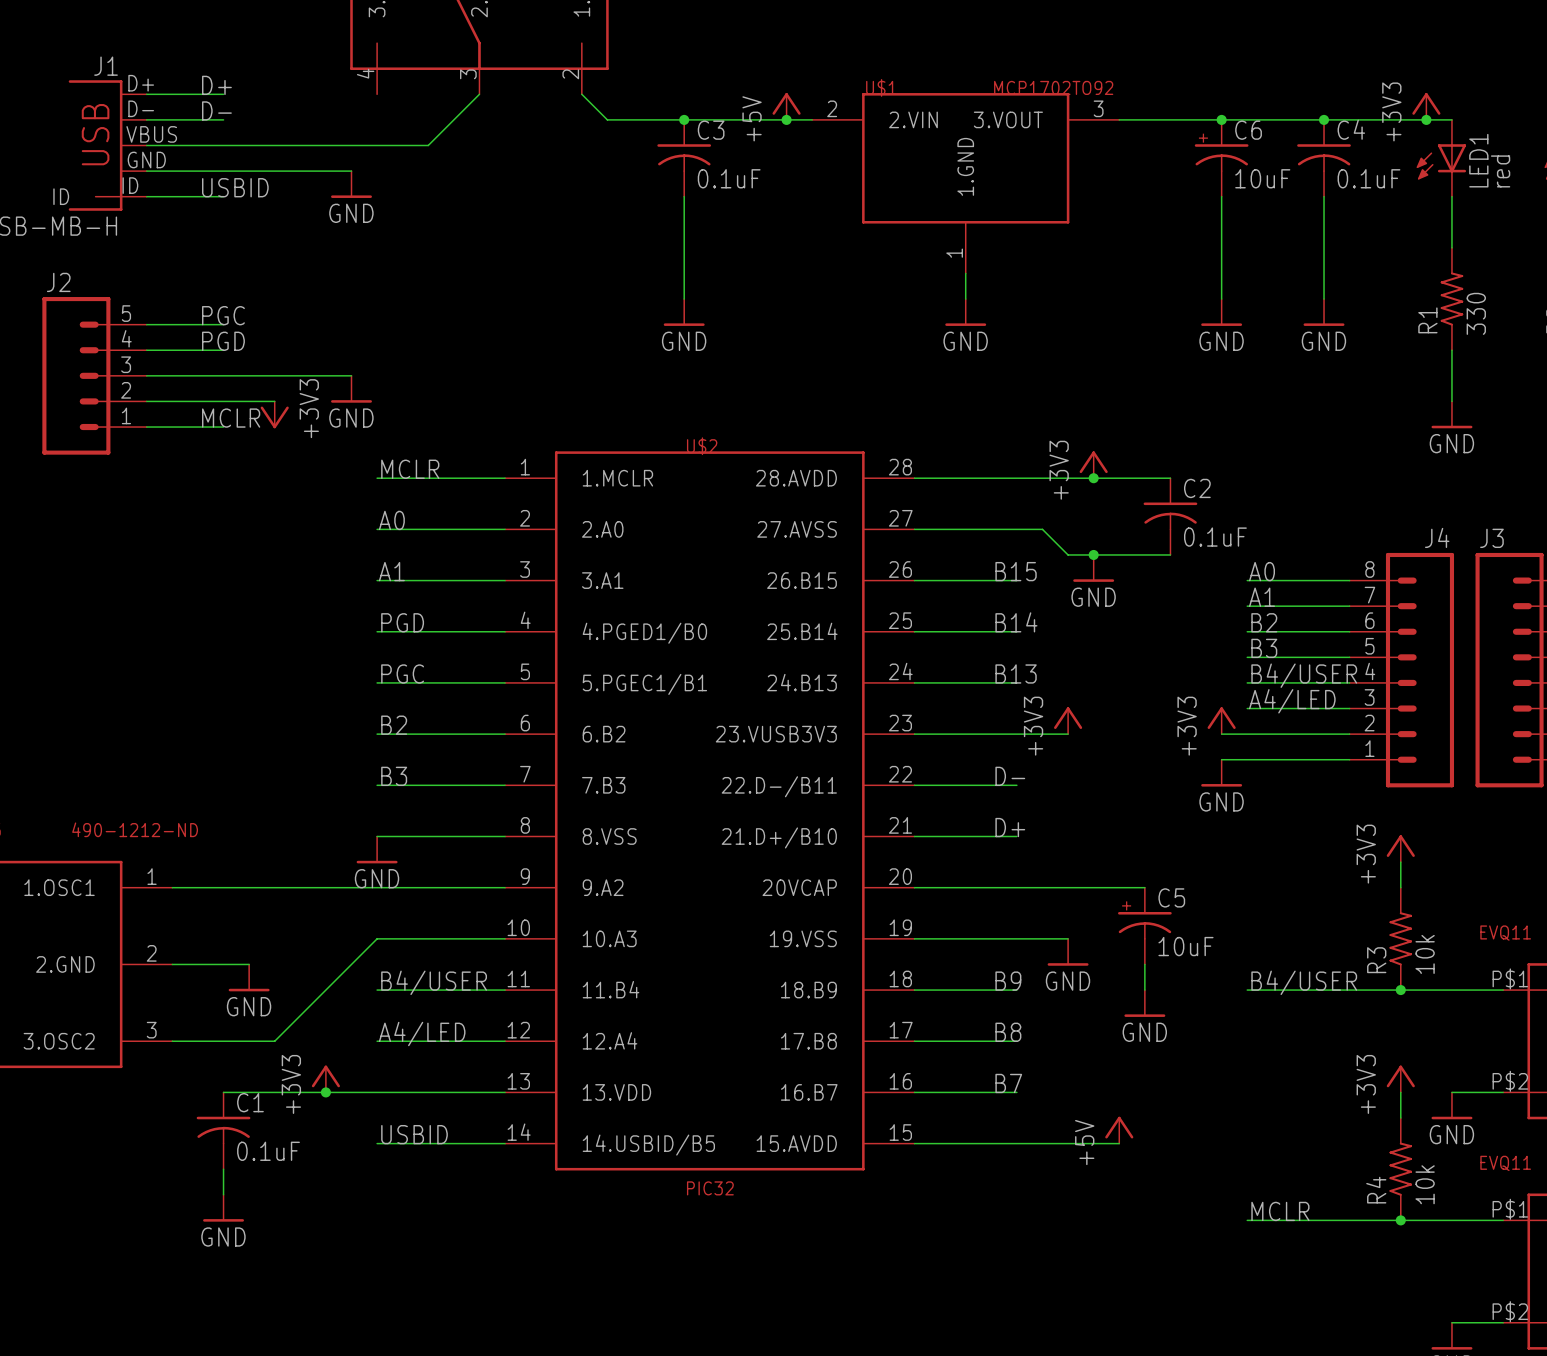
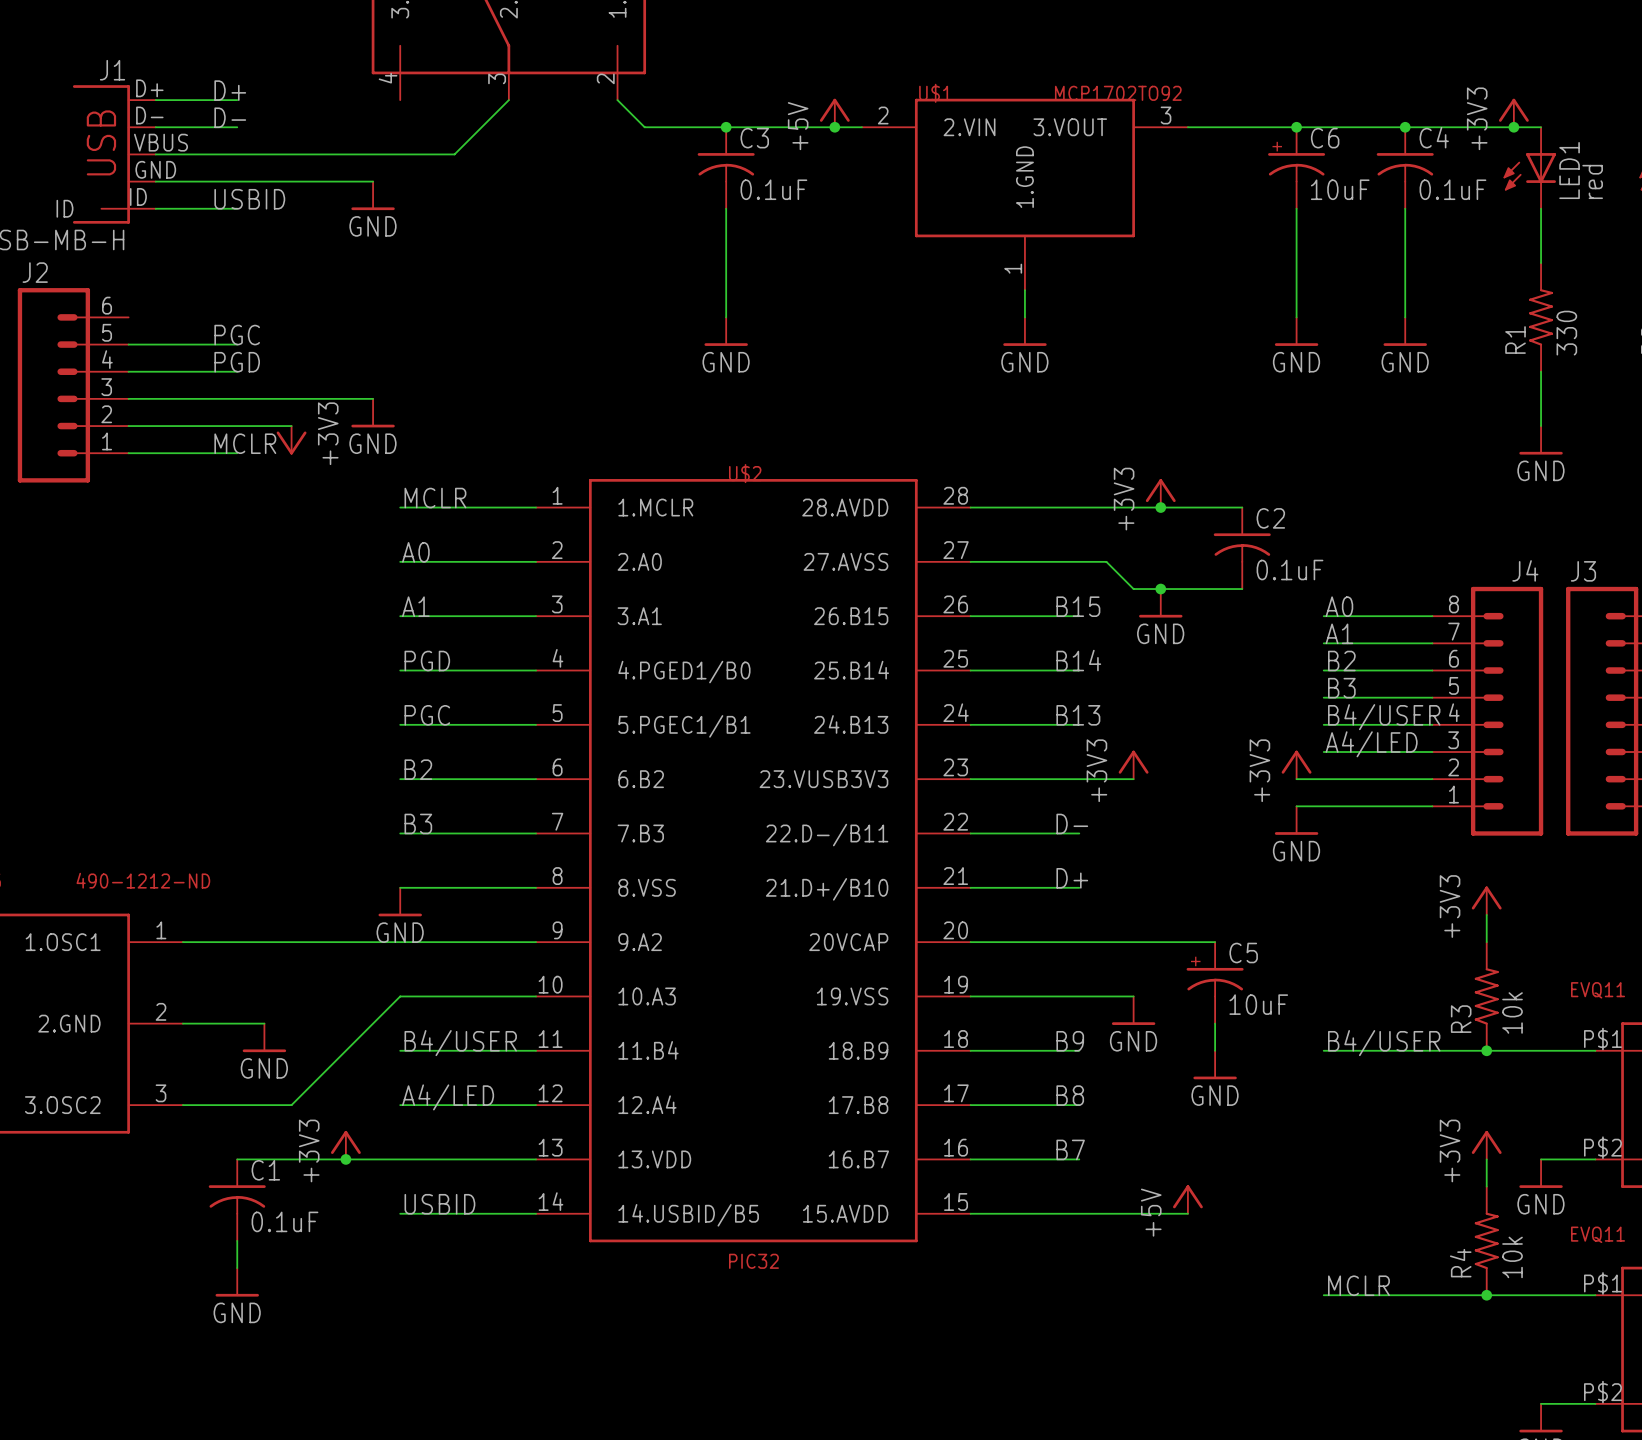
J2 symbol: [42, 297, 147, 455] -> [17, 288, 129, 483]

